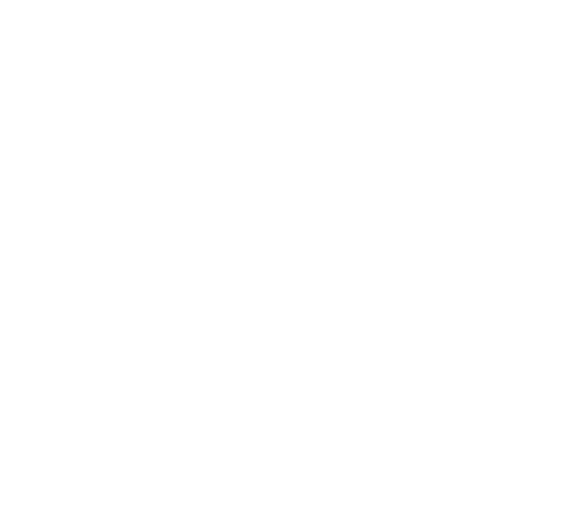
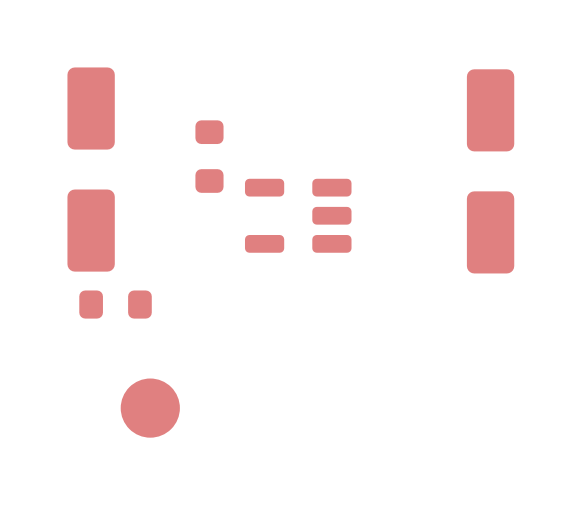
part: none -> (209, 156)
part: none -> (91, 169)
part: none -> (490, 171)
part: none -> (298, 215)
part: none -> (115, 304)
part: none -> (150, 408)

